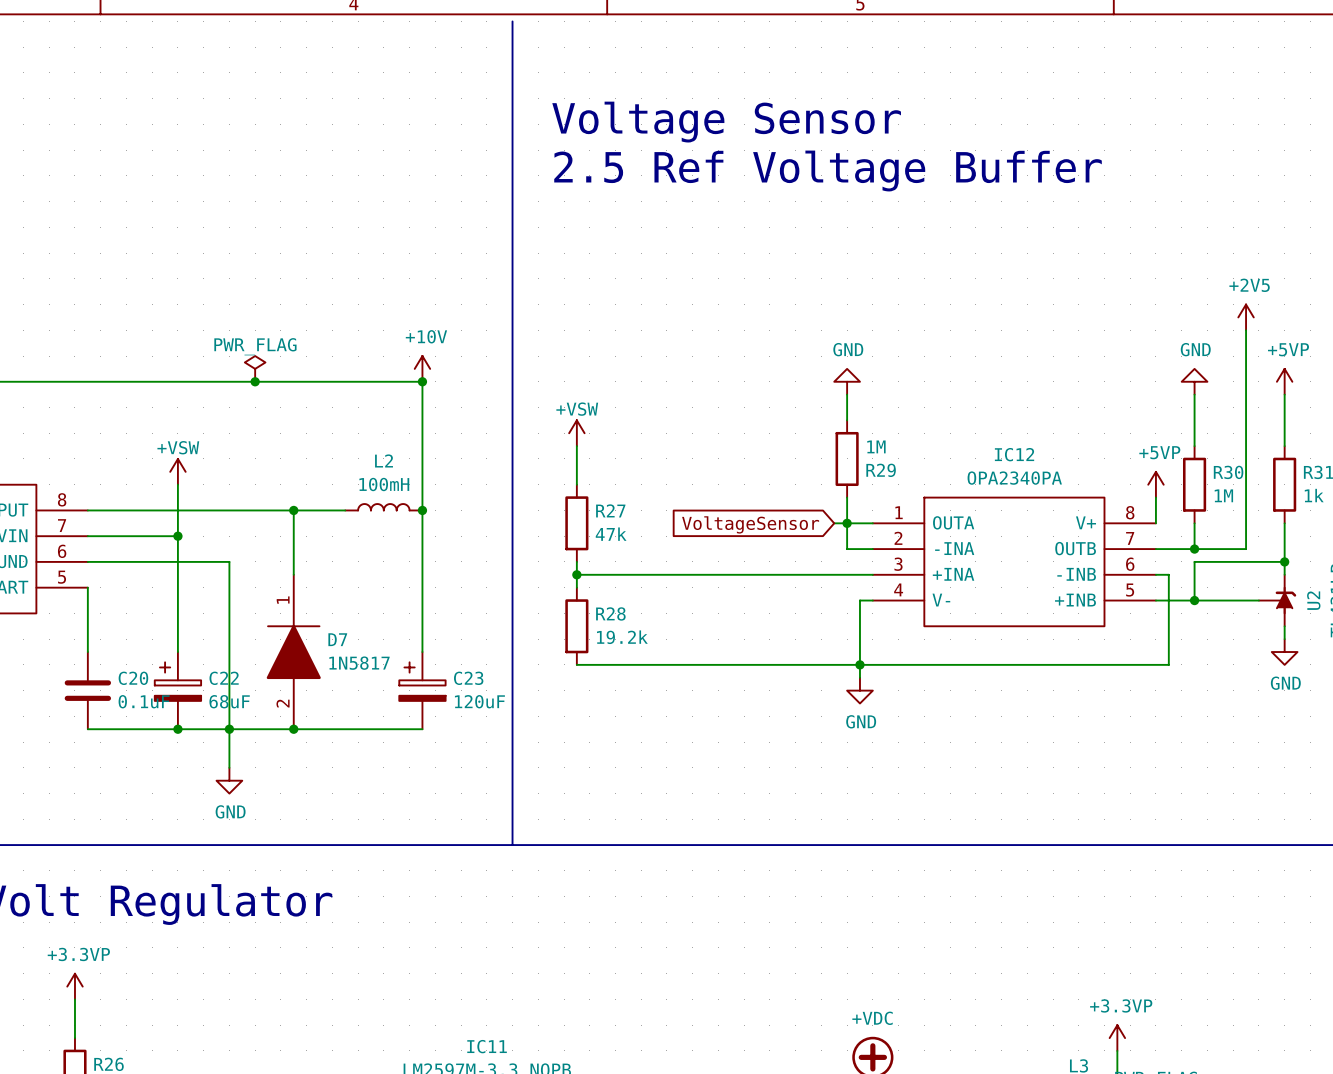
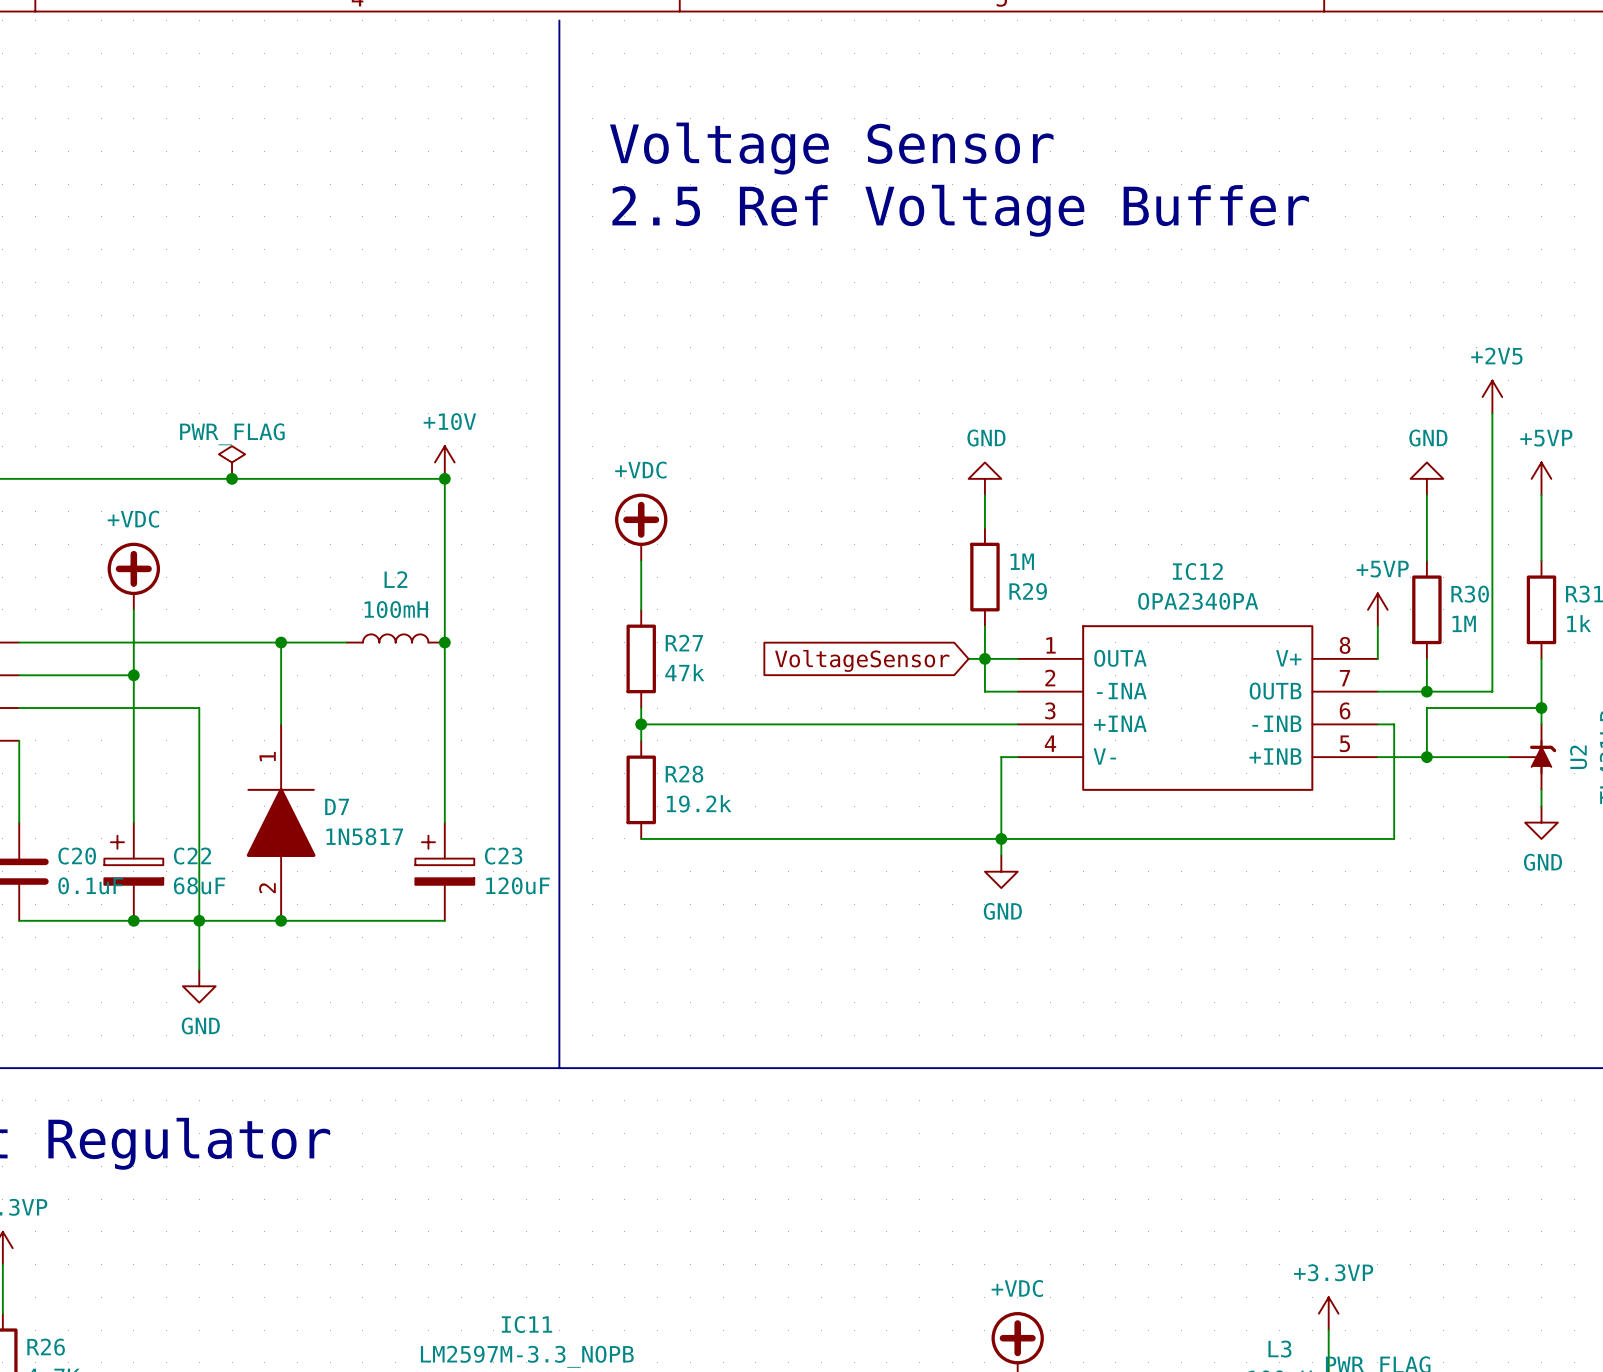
power symbol: none -> +VDC (641, 527)
power symbol: +VSW (576, 433) -> none
power symbol: none -> +VDC (133, 576)
power symbol: +VSW (177, 471) -> none

